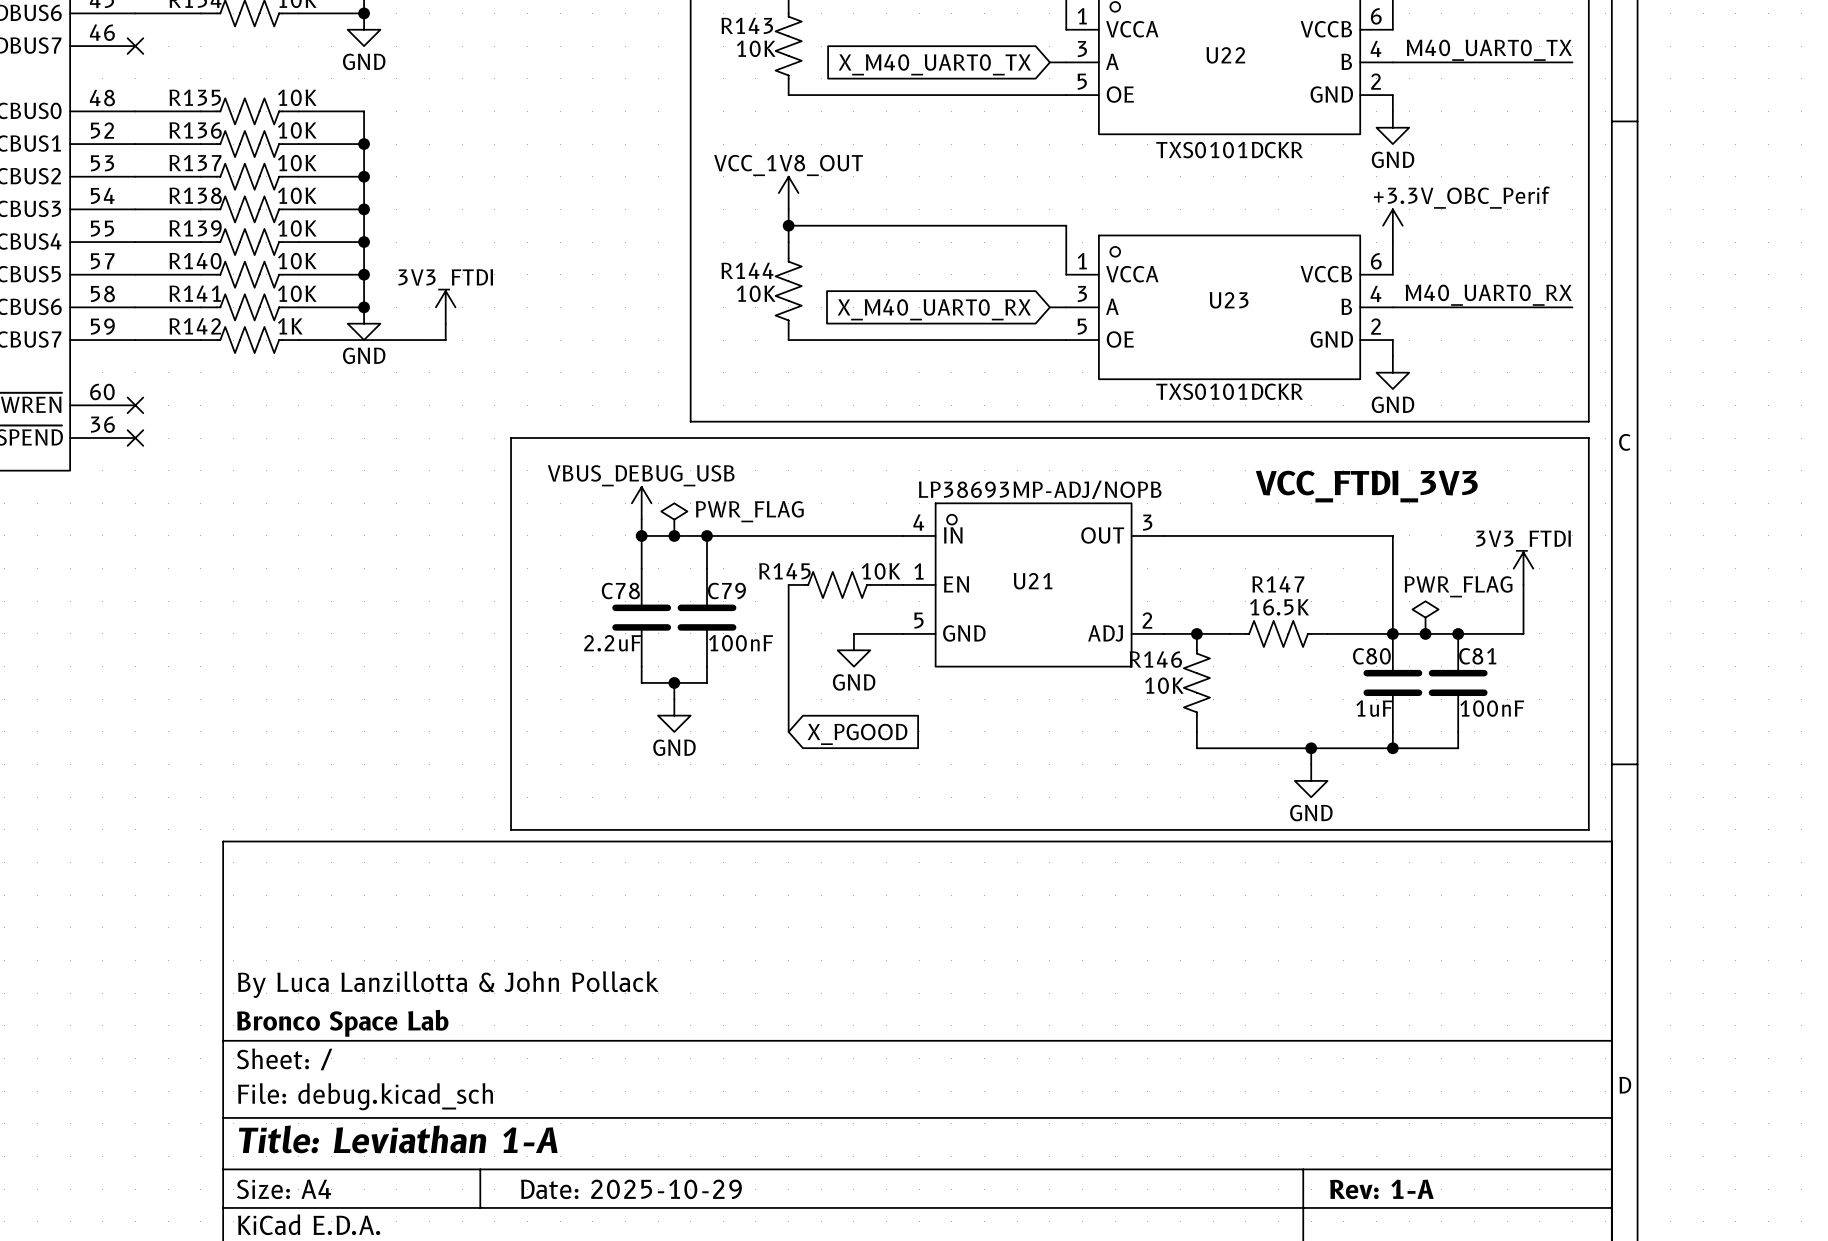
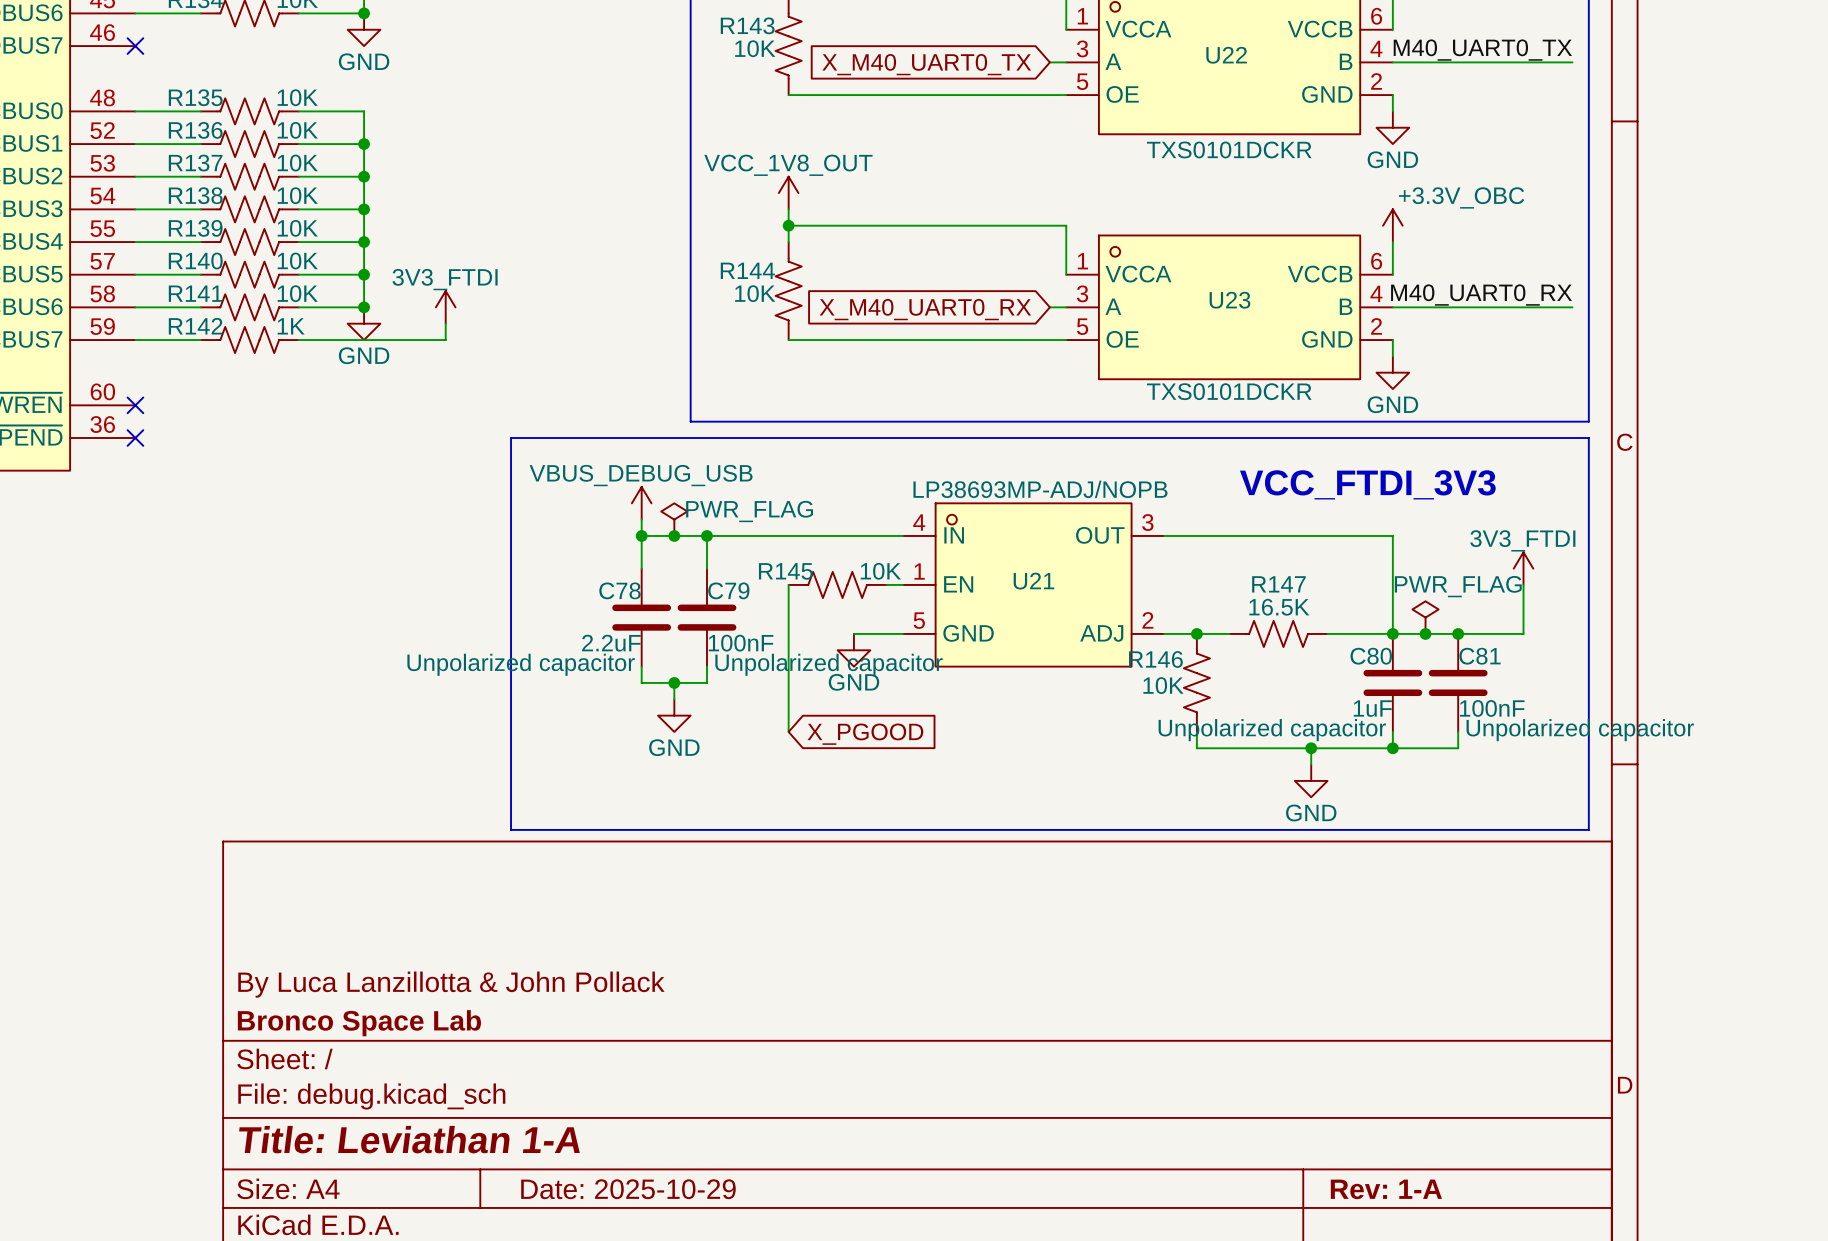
power symbol: +3.3V_OBC_Perif (1392, 225) -> +3.3V_OBC (1392, 225)
C78 text: none -> Unpolarized capacitor (521, 664)
C79 text: none -> Unpolarized capacitor (829, 664)
C80 text: none -> Unpolarized capacitor (1272, 730)
C81 text: none -> Unpolarized capacitor (1580, 730)

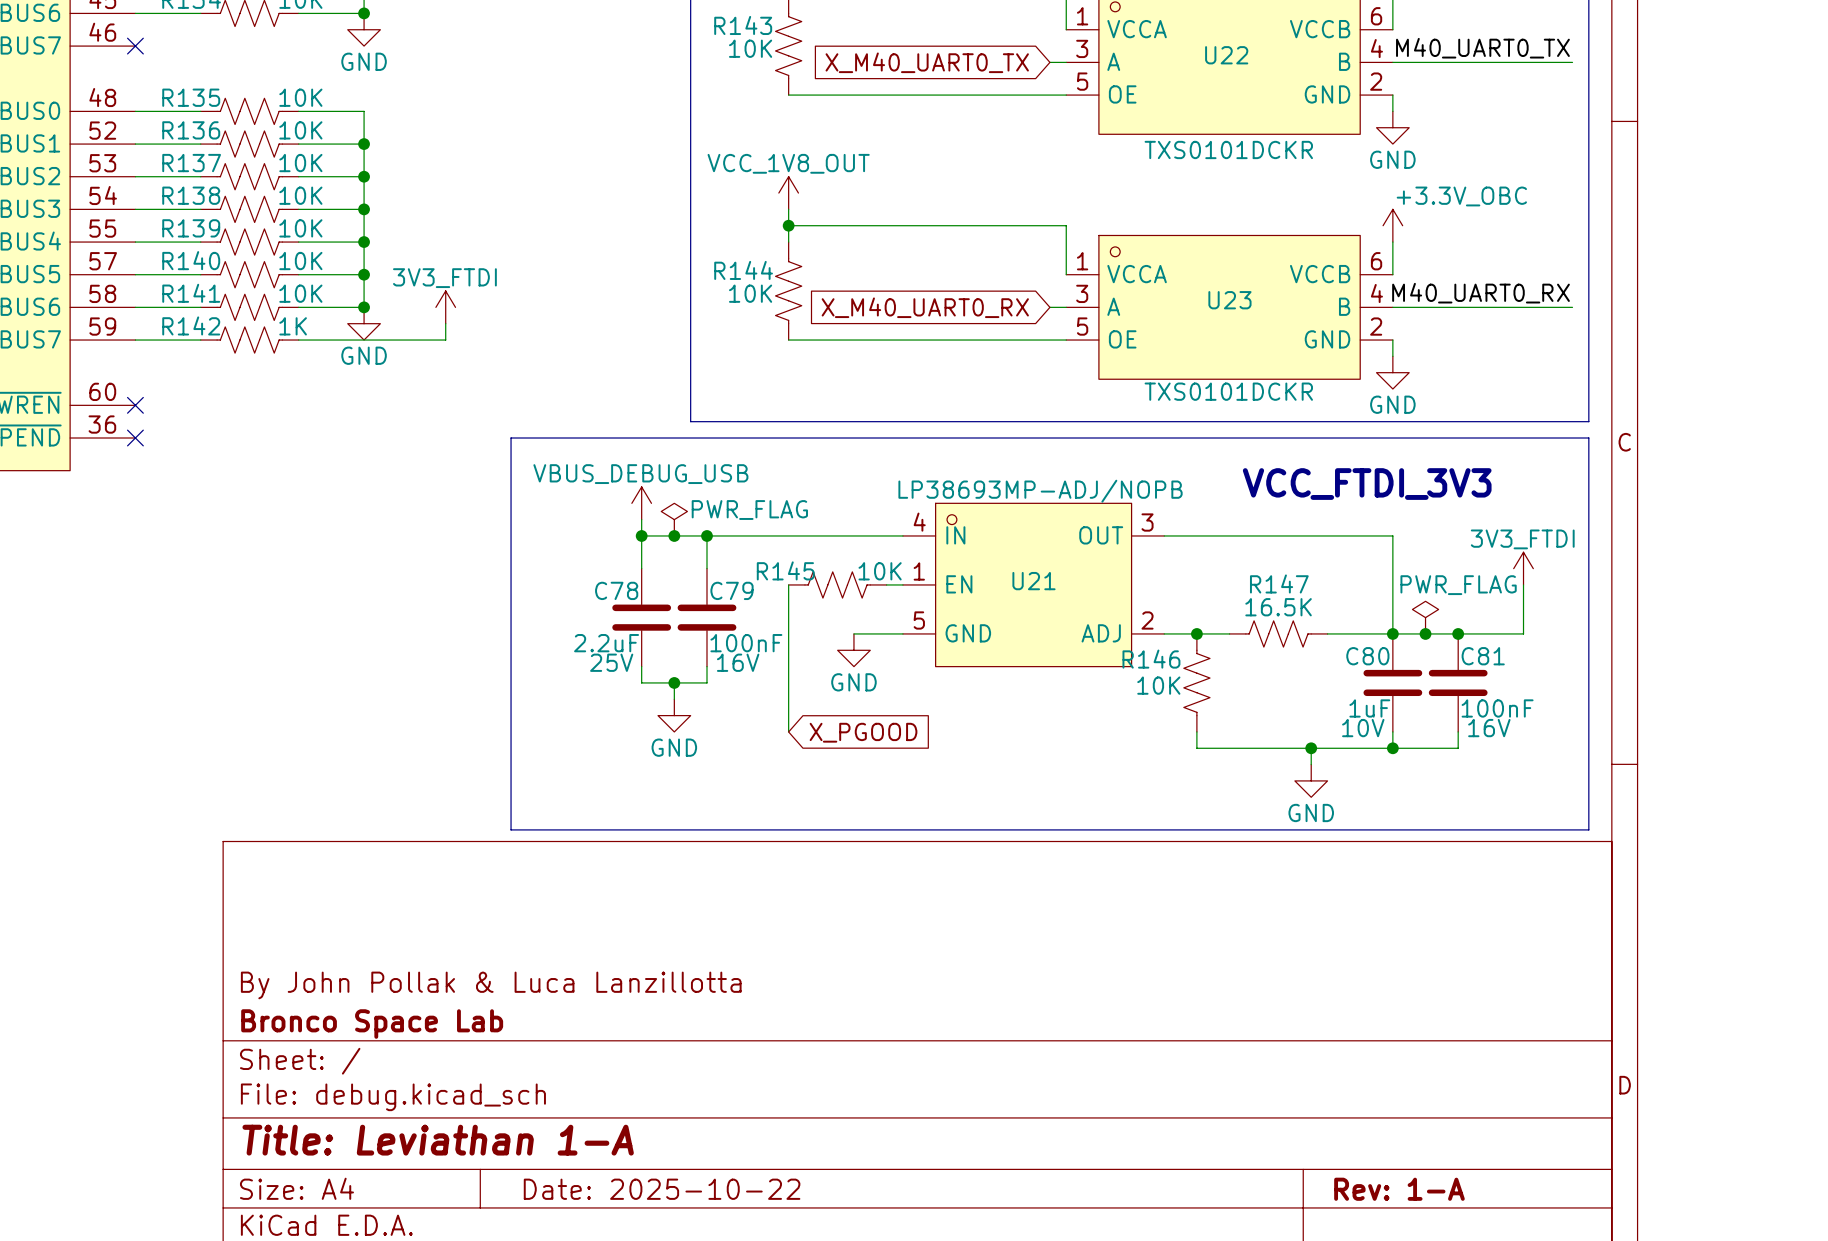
C78 text: Unpolarized capacitor (521, 664) -> 25V (611, 662)
C79 text: Unpolarized capacitor (829, 664) -> 16V (738, 662)
C80 text: Unpolarized capacitor (1272, 730) -> 10V (1363, 728)
C81 text: Unpolarized capacitor (1580, 730) -> 16V (1489, 728)
title block: By Luca Lanzillotta & John Pollack (451, 984) -> By John Pollak & Luca Lanzillotta (491, 985)
title block: Date: 2025-10-29 (628, 1189) -> Date: 2025-10-22 (662, 1189)

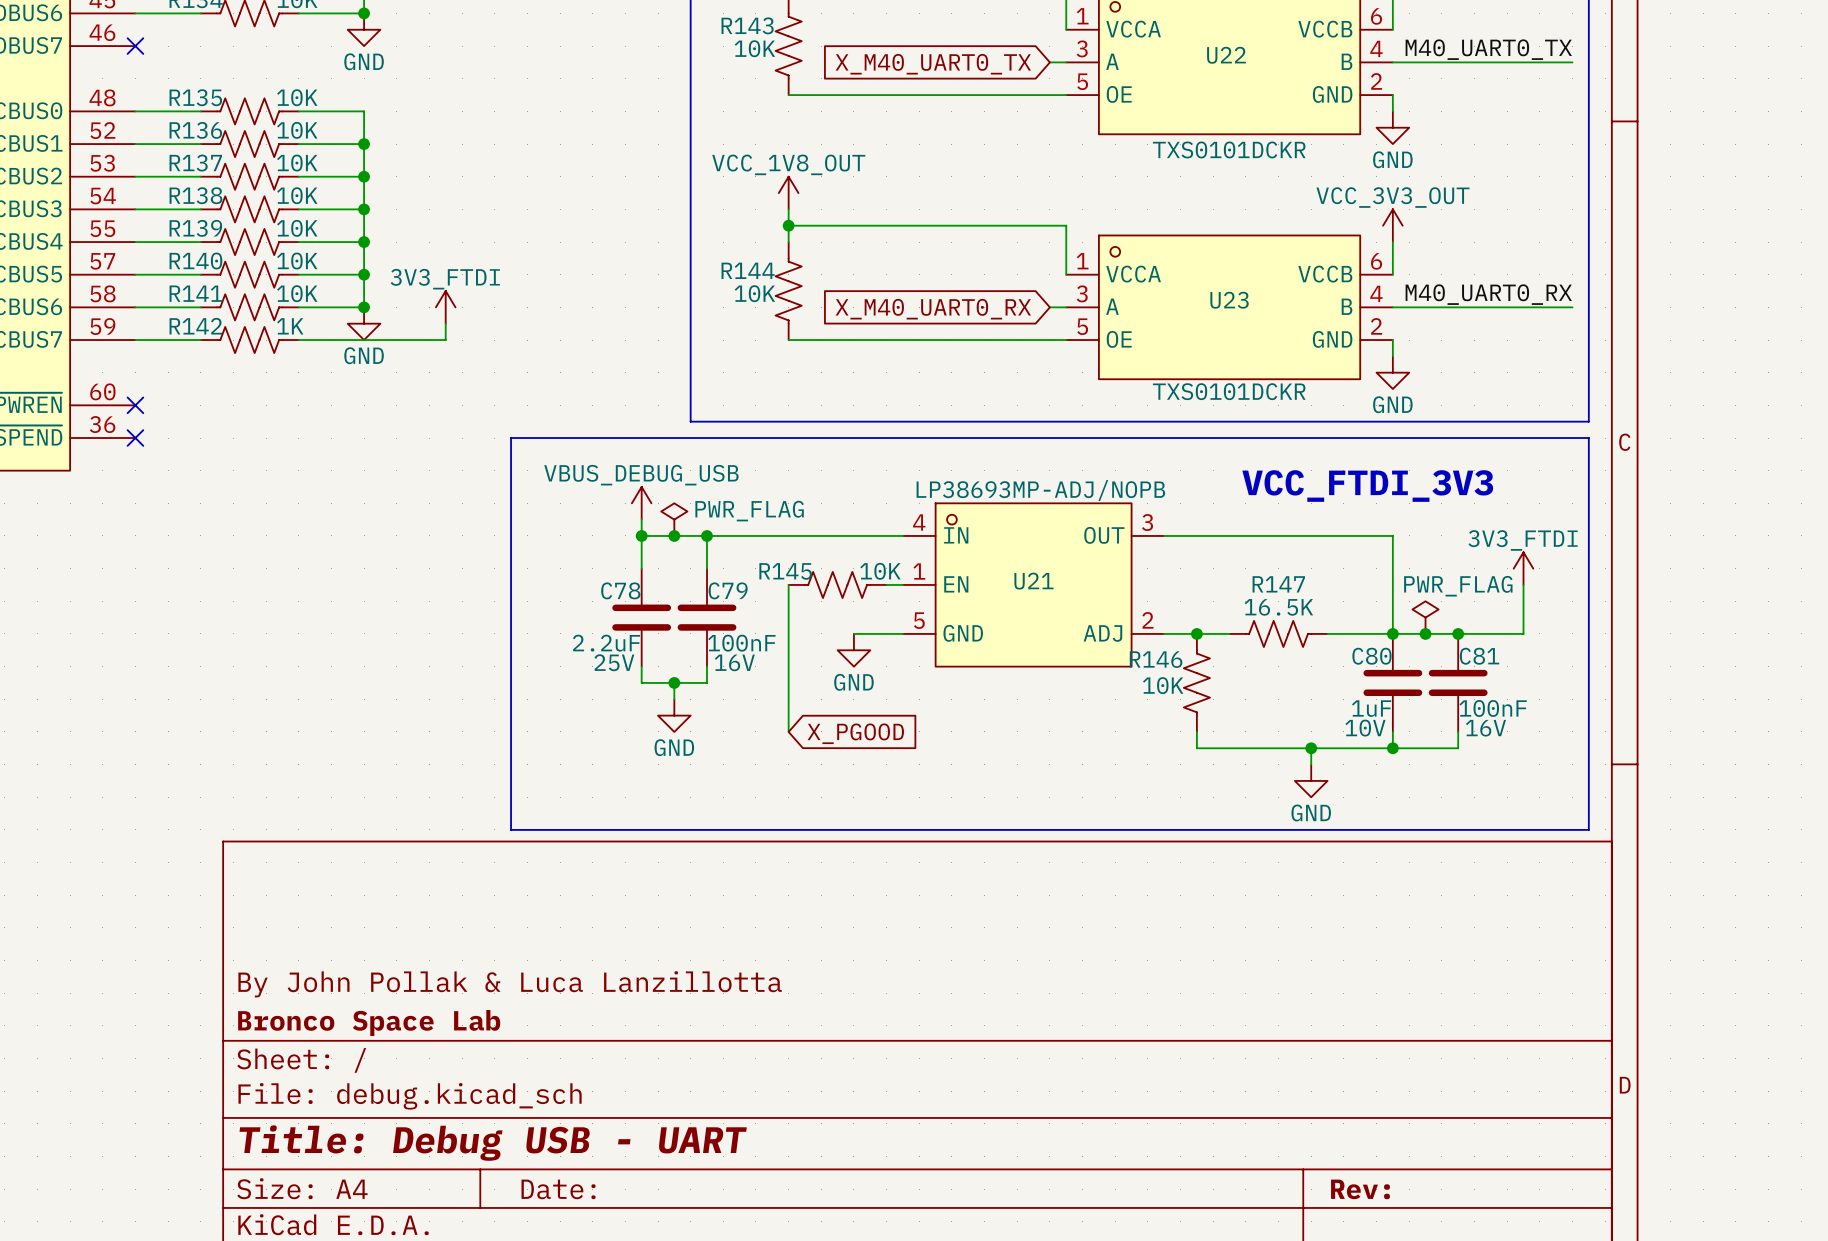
power symbol: +3.3V_OBC (1392, 225) -> VCC_3V3_OUT (1392, 225)
title block: Title: Leviathan 1-A (438, 1140) -> Title: Debug USB - UART (493, 1143)
title block: Date: 2025-10-22 (662, 1189) -> Date: (558, 1189)
title block: Rev: 1-A (1399, 1189) -> Rev: (1360, 1189)

